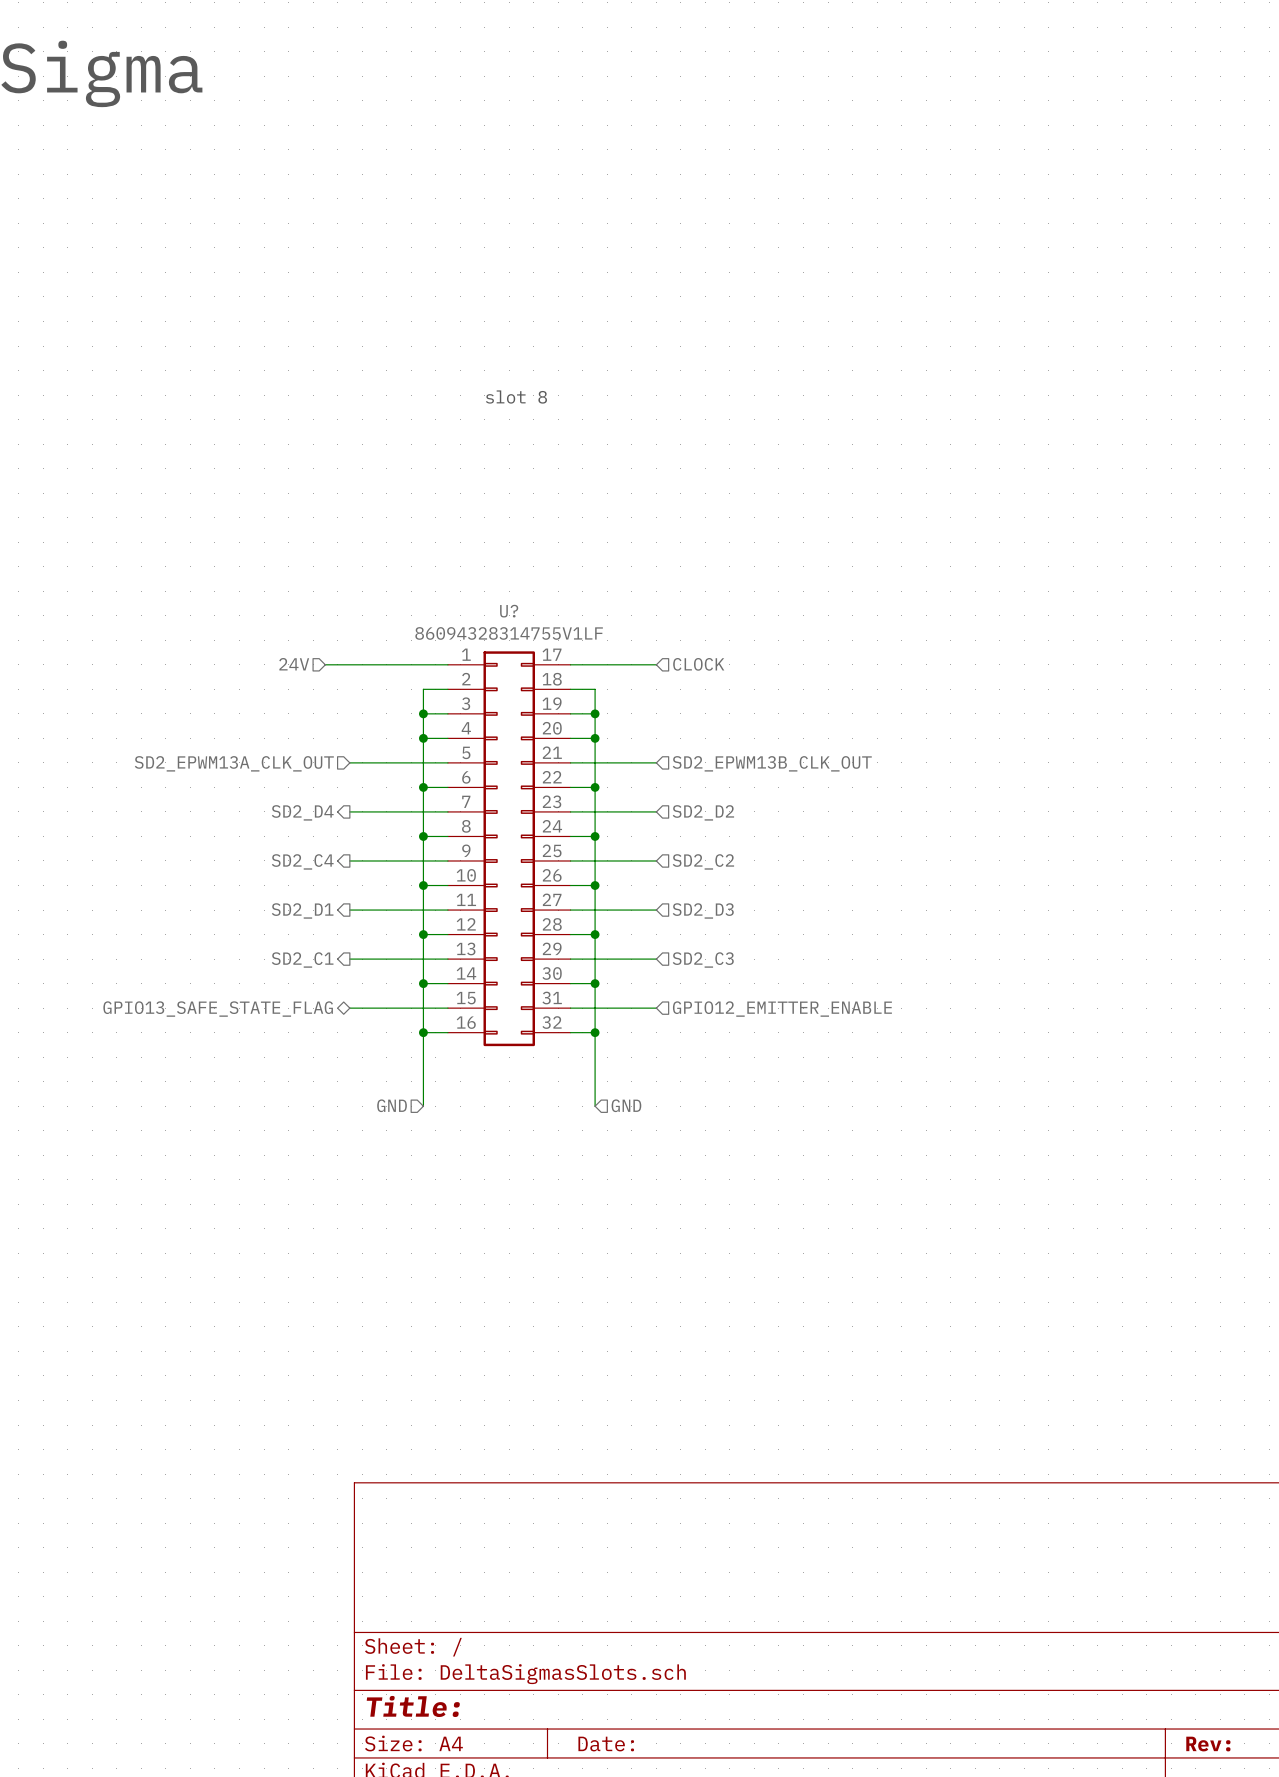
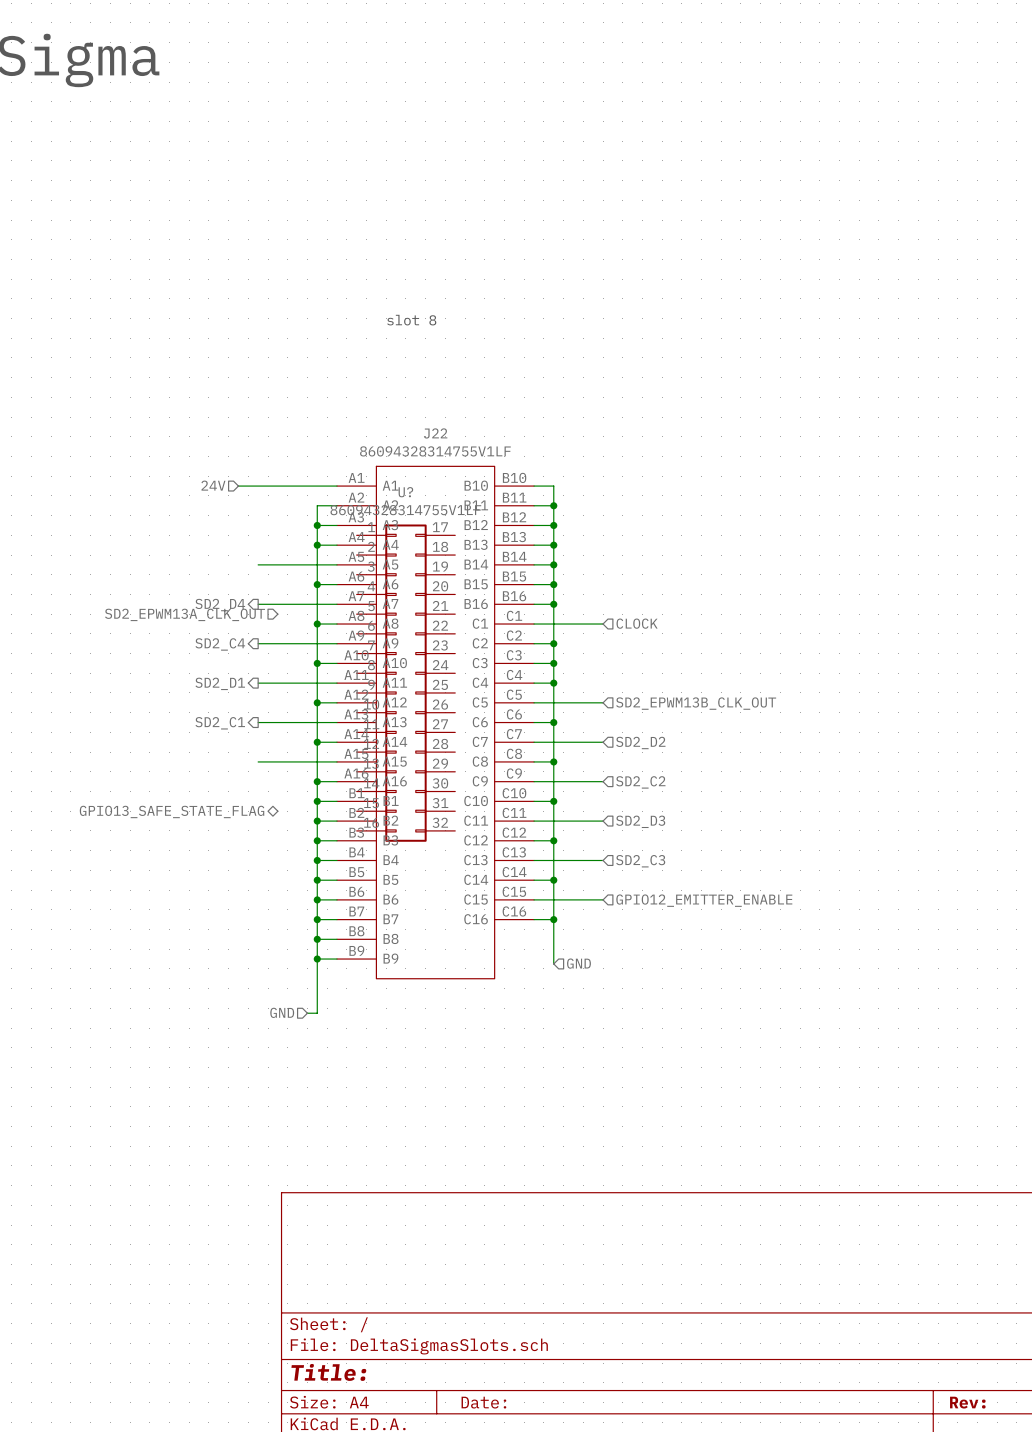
wire: none -> (534, 486) (553, 486) (553, 963)
wire: none -> (336, 505) (317, 505) (317, 1013) (307, 1013)
wire: none -> (534, 505) (553, 505)
junction: none -> (553, 505)
junction: none -> (317, 525)
wire: none -> (534, 525) (553, 525)
junction: none -> (553, 525)
hierarchical label position: 24V (294, 664) -> 24V (213, 485)
wire: (325, 664) (447, 664) -> (238, 486) (336, 486)
wire: (570, 664) (656, 664) -> (534, 624) (603, 624)
hierarchical label position: CLOCK (698, 664) -> CLOCK (637, 623)
junction: none -> (317, 545)
wire: none -> (534, 545) (553, 545)
junction: none -> (553, 545)
wire: (447, 689) (423, 689) (423, 1106) -> none
wire: (570, 689) (595, 689) (595, 1106) -> none
wire: none -> (534, 564) (553, 564)
junction: none -> (553, 564)
wire: (423, 713) (447, 713) -> (317, 525) (336, 525)
junction: (423, 713) -> none
wire: (570, 713) (595, 713) -> (534, 663) (553, 663)
junction: (595, 713) -> none
junction: none -> (317, 584)
wire: none -> (534, 584) (553, 584)
junction: none -> (553, 584)
wire: (423, 738) (447, 738) -> (317, 545) (336, 545)
junction: (423, 738) -> none
wire: (570, 738) (595, 738) -> (534, 683) (553, 683)
junction: (595, 738) -> none
wire: none -> (534, 604) (553, 604)
junction: none -> (553, 604)
wire: (349, 762) (447, 762) -> (258, 564) (336, 564)
wire: (570, 762) (656, 762) -> (534, 702) (603, 702)
hierarchical label position: SD2_EPWM13B_CLK_OUT (772, 763) -> SD2_EPWM13B_CLK_OUT (696, 703)
junction: none -> (317, 624)
wire: (423, 787) (447, 787) -> (317, 584) (336, 584)
junction: (423, 787) -> none
wire: (570, 787) (595, 787) -> (534, 722) (553, 722)
junction: (595, 787) -> none
wire: none -> (534, 643) (553, 643)
junction: none -> (553, 643)
wire: (349, 811) (447, 811) -> (258, 604) (336, 604)
wire: (570, 811) (656, 811) -> (534, 742) (603, 742)
hierarchical label position: SD2_D4 (302, 812) -> SD2_D4 (220, 605)
hierarchical label position: SD2_D2 (703, 812) -> SD2_D2 (640, 742)
junction: none -> (317, 663)
junction: none -> (553, 663)
wire: (423, 836) (447, 836) -> (317, 624) (336, 624)
junction: (423, 836) -> none
wire: (570, 836) (595, 836) -> (534, 761) (553, 761)
junction: (595, 836) -> none
junction: none -> (553, 683)
wire: (349, 860) (447, 860) -> (258, 643) (336, 643)
wire: (570, 860) (656, 860) -> (534, 781) (603, 781)
hierarchical label position: SD2_C4 (302, 861) -> SD2_C4 (220, 644)
hierarchical label position: SD2_C2 (703, 861) -> SD2_C2 (640, 782)
junction: none -> (317, 702)
wire: (423, 885) (447, 885) -> (317, 663) (336, 663)
junction: (423, 885) -> none
wire: (570, 885) (595, 885) -> (534, 801) (553, 801)
junction: (595, 885) -> none
J22: none -> 86094328314755V1LF (435, 722)
junction: none -> (553, 722)
hierarchical label position: SD2_D1 (302, 910) -> SD2_D1 (220, 683)
wire: (349, 910) (447, 910) -> (258, 683) (336, 683)
wire: (570, 910) (656, 910) -> (534, 821) (603, 821)
hierarchical label position: SD2_D3 (703, 910) -> SD2_D3 (640, 821)
junction: none -> (317, 742)
wire: (423, 934) (447, 934) -> (317, 702) (336, 702)
junction: (423, 934) -> none
wire: (570, 934) (595, 934) -> (534, 840) (553, 840)
junction: (595, 934) -> none
junction: none -> (553, 761)
wire: (349, 959) (447, 959) -> (258, 722) (336, 722)
wire: (570, 959) (656, 959) -> (534, 860) (603, 860)
hierarchical label position: SD2_C1 (302, 960) -> SD2_C1 (220, 723)
hierarchical label position: SD2_C3 (703, 960) -> SD2_C3 (640, 861)
junction: none -> (317, 781)
wire: (423, 983) (447, 983) -> (317, 742) (336, 742)
junction: (423, 983) -> none
wire: (570, 983) (595, 983) -> (534, 880) (553, 880)
junction: (595, 983) -> none
wire: none -> (317, 801) (336, 801)
junction: none -> (317, 801)
junction: none -> (553, 801)
wire: (349, 1008) (447, 1008) -> (258, 761) (336, 761)
wire: (570, 1008) (656, 1008) -> (534, 899) (603, 899)
hierarchical label position: GPIO12_EMITTER_ENABLE (782, 1009) -> GPIO12_EMITTER_ENABLE (704, 900)
wire: none -> (317, 821) (336, 821)
junction: none -> (317, 821)
wire: (423, 1032) (447, 1032) -> (317, 781) (336, 781)
junction: (423, 1032) -> none
wire: (570, 1032) (595, 1032) -> (534, 919) (553, 919)
junction: (595, 1032) -> none
wire: none -> (317, 840) (336, 840)
junction: none -> (317, 840)
junction: none -> (553, 840)
wire: none -> (317, 860) (336, 860)
junction: none -> (317, 860)
wire: none -> (317, 880) (336, 880)
junction: none -> (317, 880)
junction: none -> (553, 880)
hierarchical label: GND (392, 1105) -> none
hierarchical label position: GND (626, 1105) -> GND (578, 963)
wire: none -> (317, 899) (336, 899)
junction: none -> (317, 899)
wire: none -> (317, 919) (336, 919)
junction: none -> (317, 919)
junction: none -> (553, 919)
wire: none -> (317, 939) (336, 939)
junction: none -> (317, 939)
wire: none -> (317, 959) (336, 959)
junction: none -> (317, 959)
hierarchical label: none -> GND (282, 1012)

